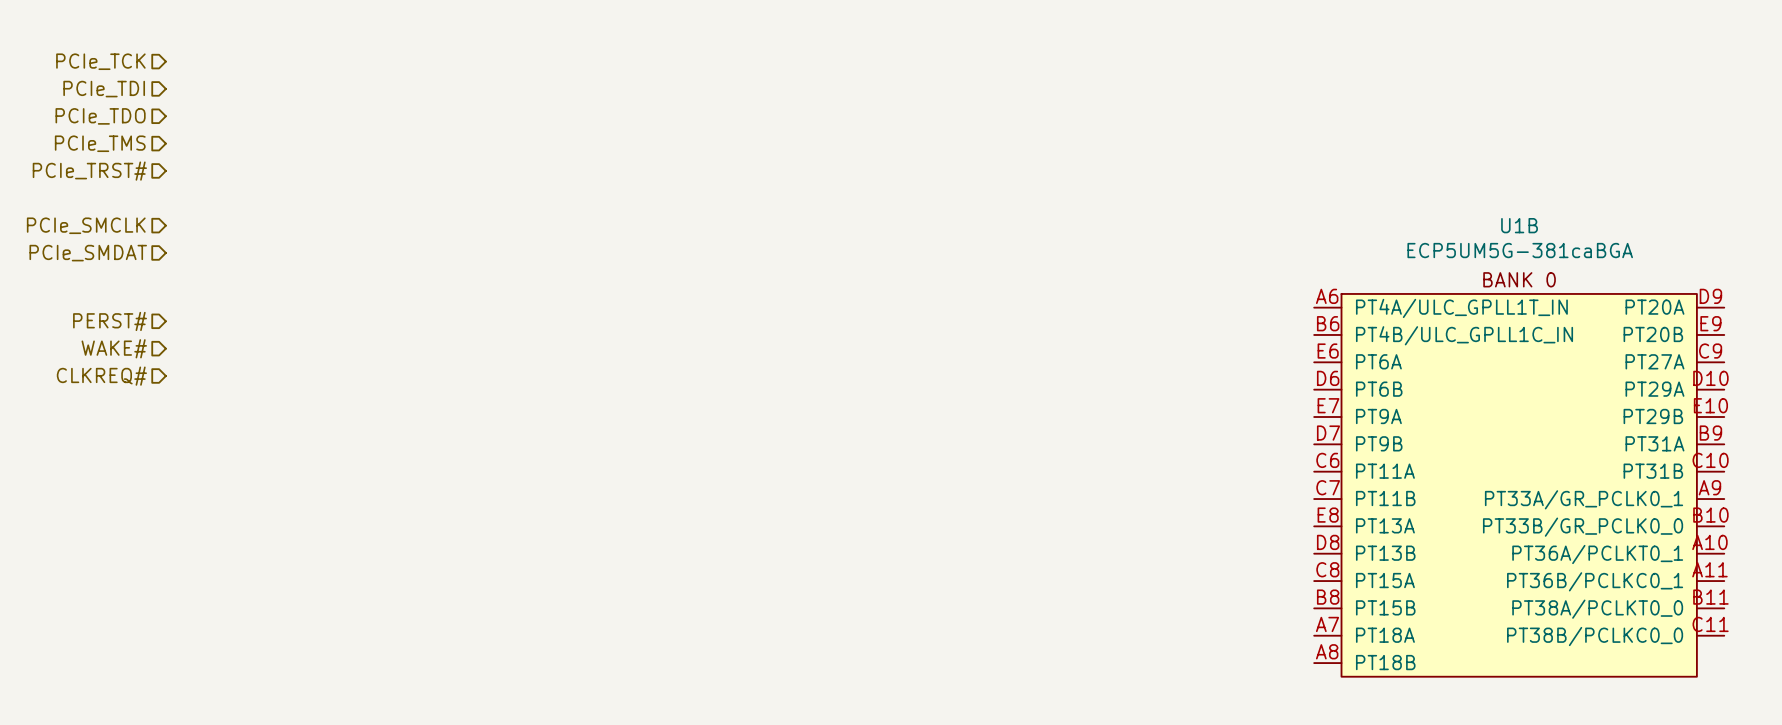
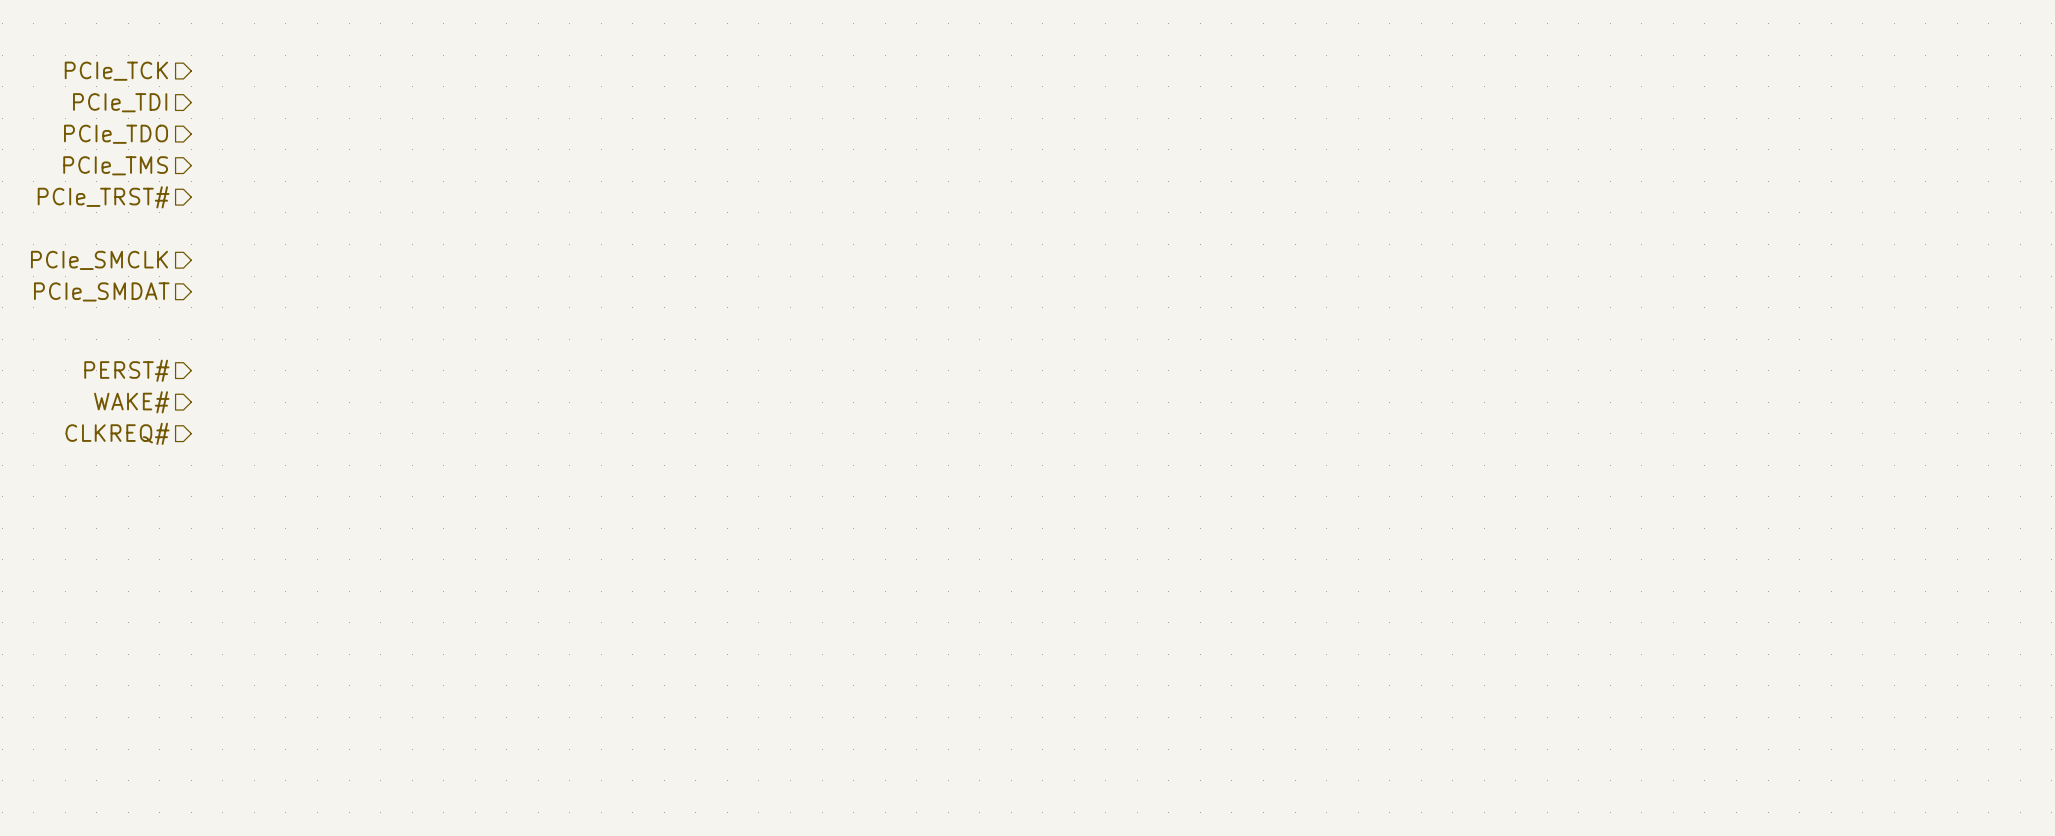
U1B: ECP5UM5G-381caBGA (1519, 485) -> none

